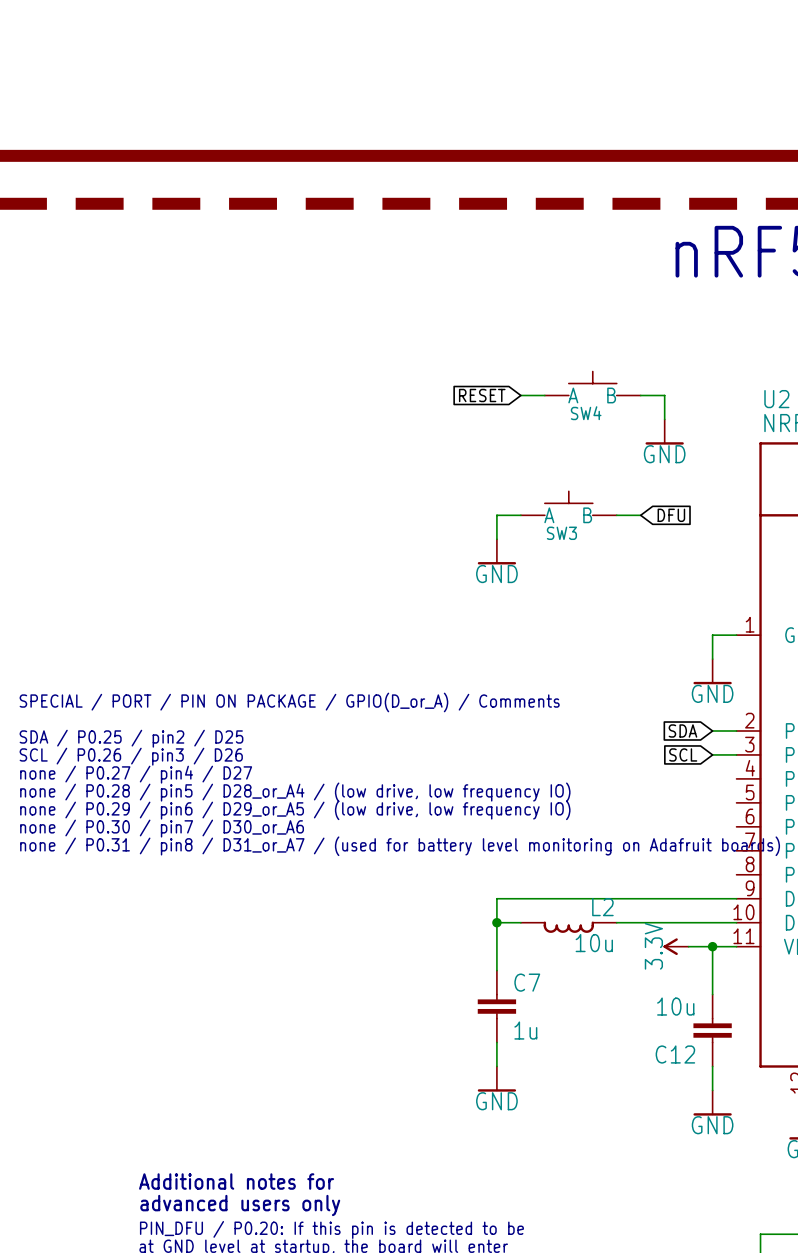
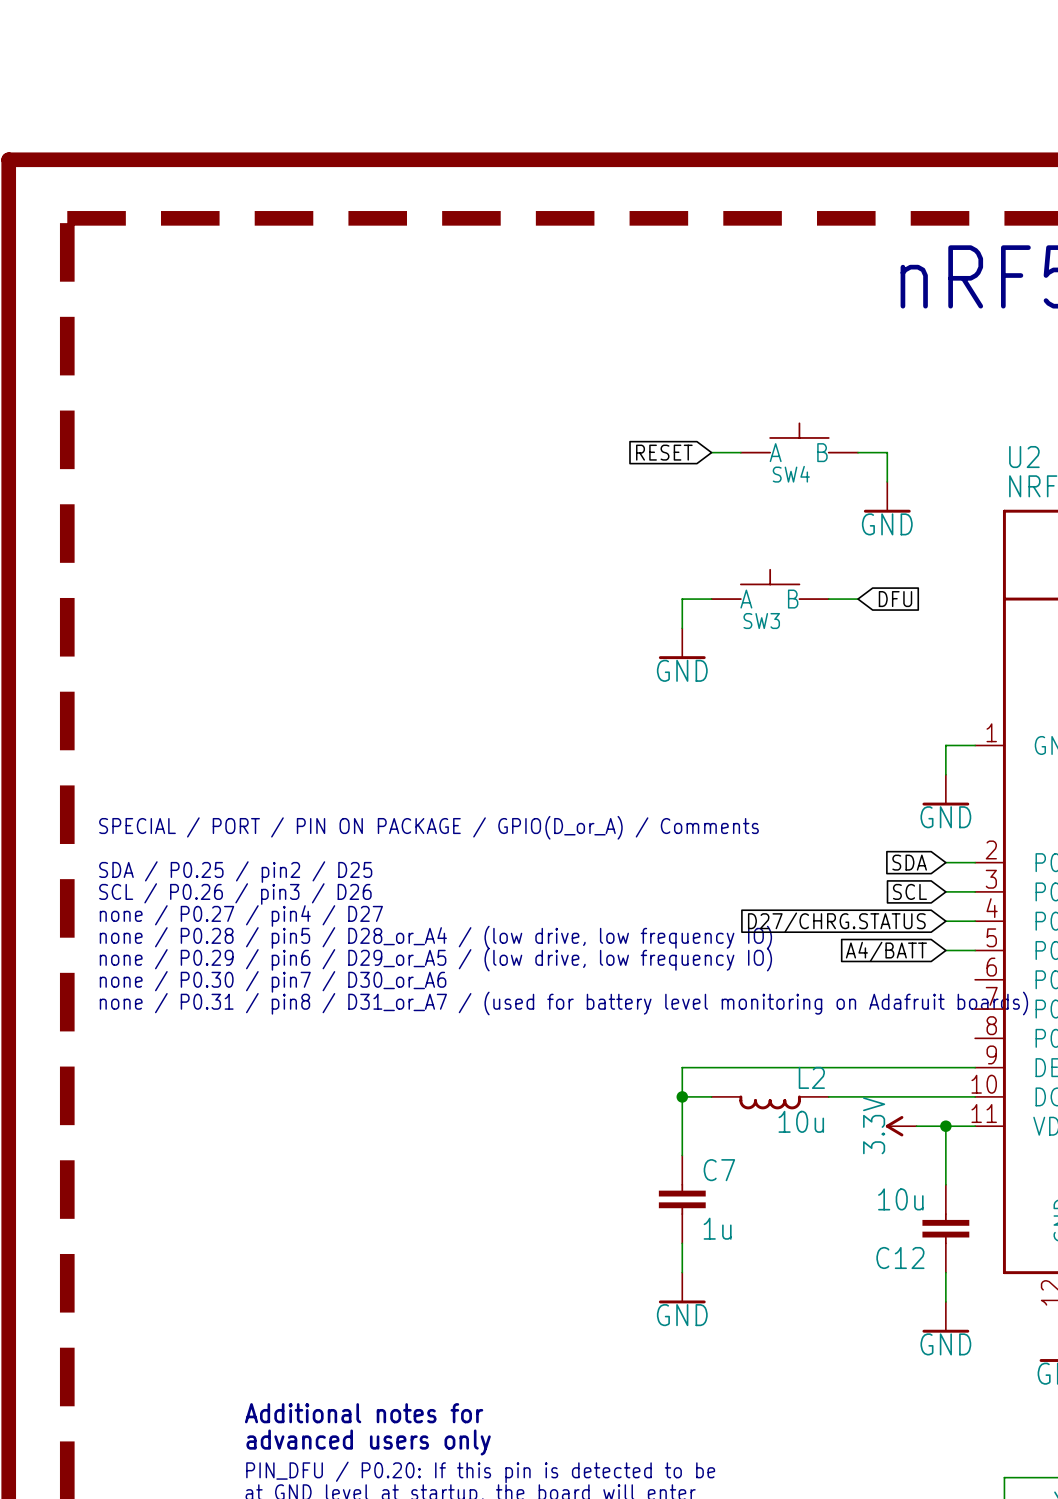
wire: none -> (945, 921) (975, 921)
global label: none -> D27/CHRG.STATUS (836, 922)
wire: none -> (945, 950) (975, 950)
global label: none -> A4/BATT (886, 951)

